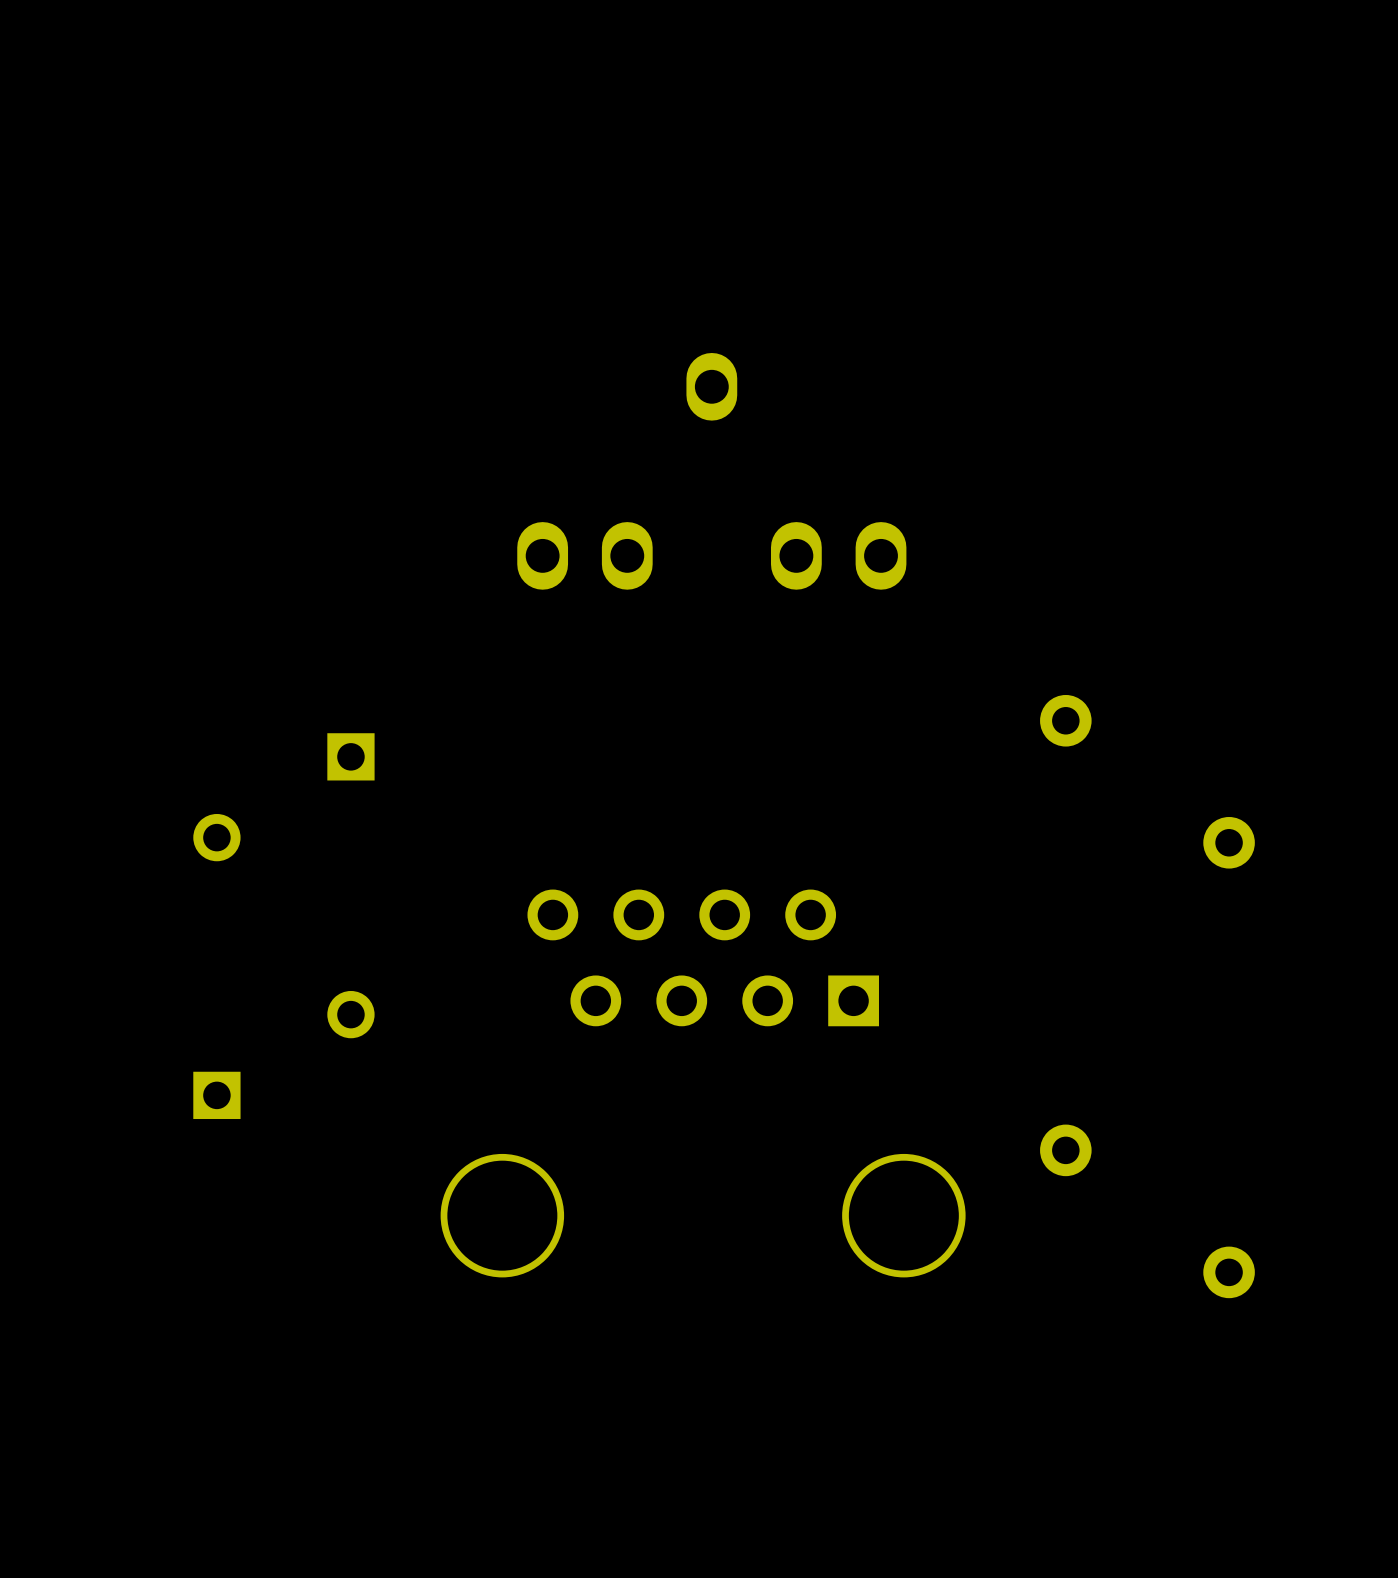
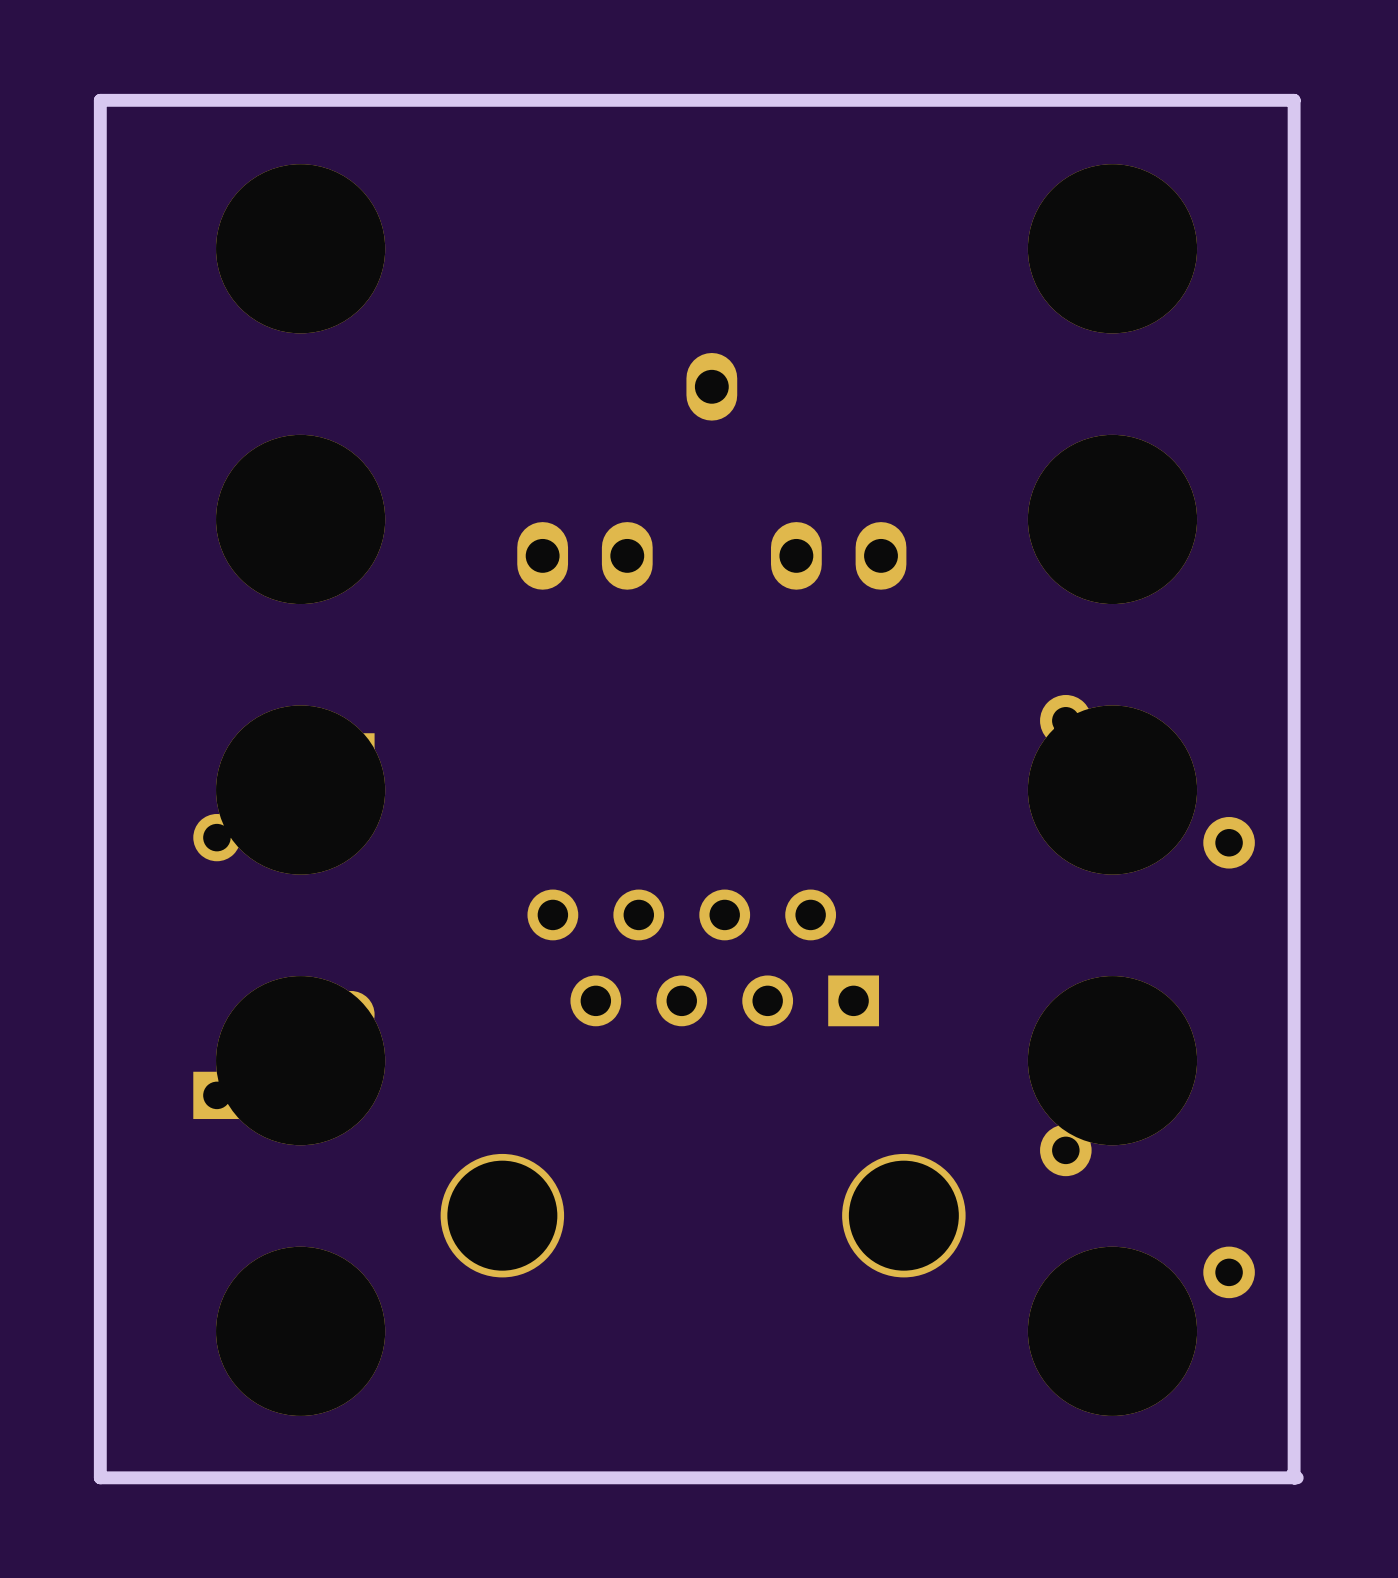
part: none -> (300, 248)
part: none -> (1112, 248)
part: none -> (300, 519)
part: none -> (1112, 519)
part: none -> (300, 790)
part: none -> (1112, 790)
part: none -> (300, 1060)
part: none -> (1112, 1060)
part: none -> (300, 1331)
part: none -> (1112, 1331)
board edge: none -> (1297, 1477) (100, 1477) (100, 100) (1294, 100) (1294, 1477)

